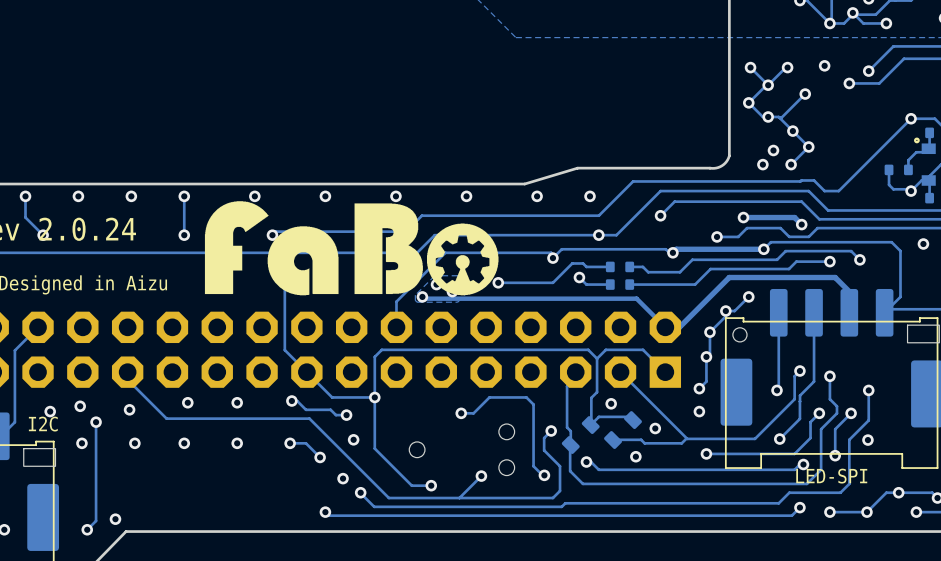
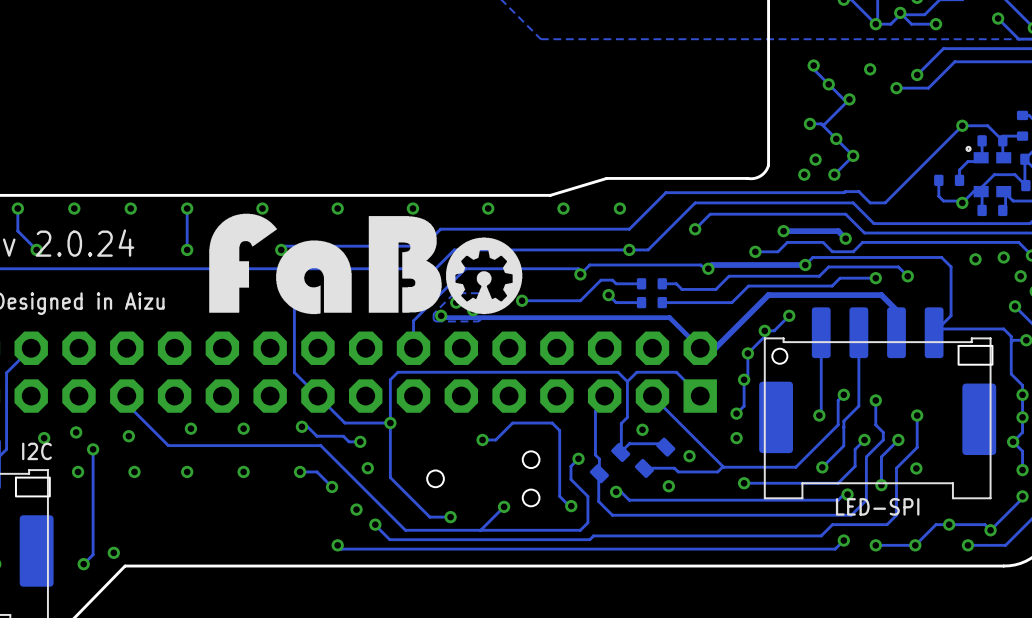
track: none -> (813, 65) (813, 69) (843, 99) (849, 99)
via: none -> (813, 65)
track: (750, 67) (768, 85) -> none
via: (750, 67) -> none
track: (787, 67) (768, 85) -> none
via: (787, 67) -> none
via: none -> (828, 84)
track: (768, 85) (748, 102) (764, 116) -> none
via: (768, 85) -> none
via: (748, 102) -> none

